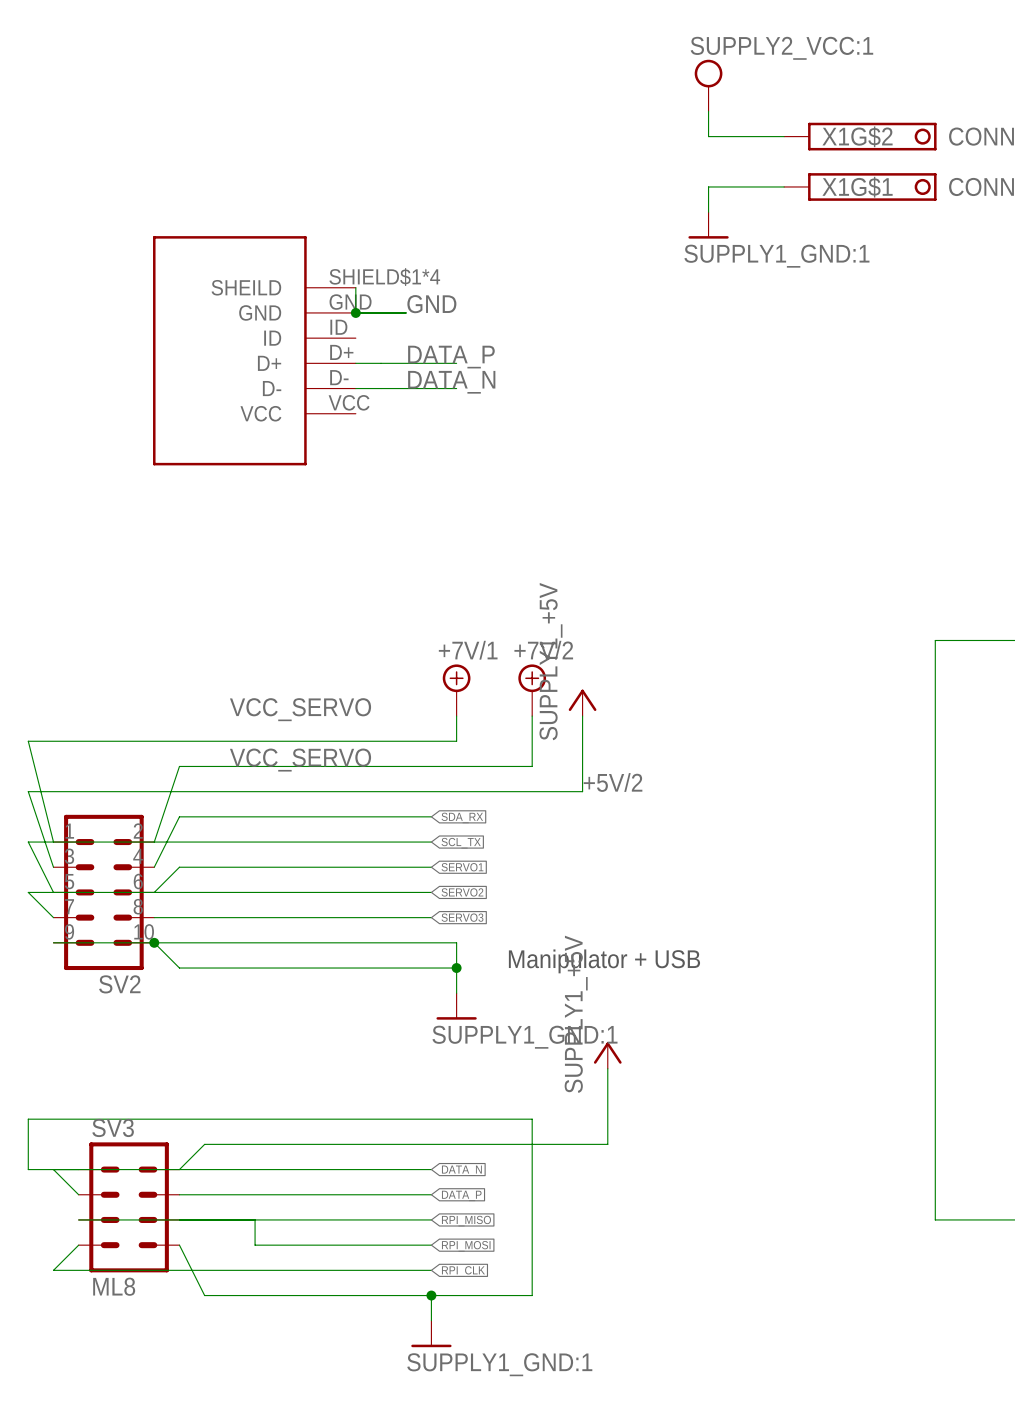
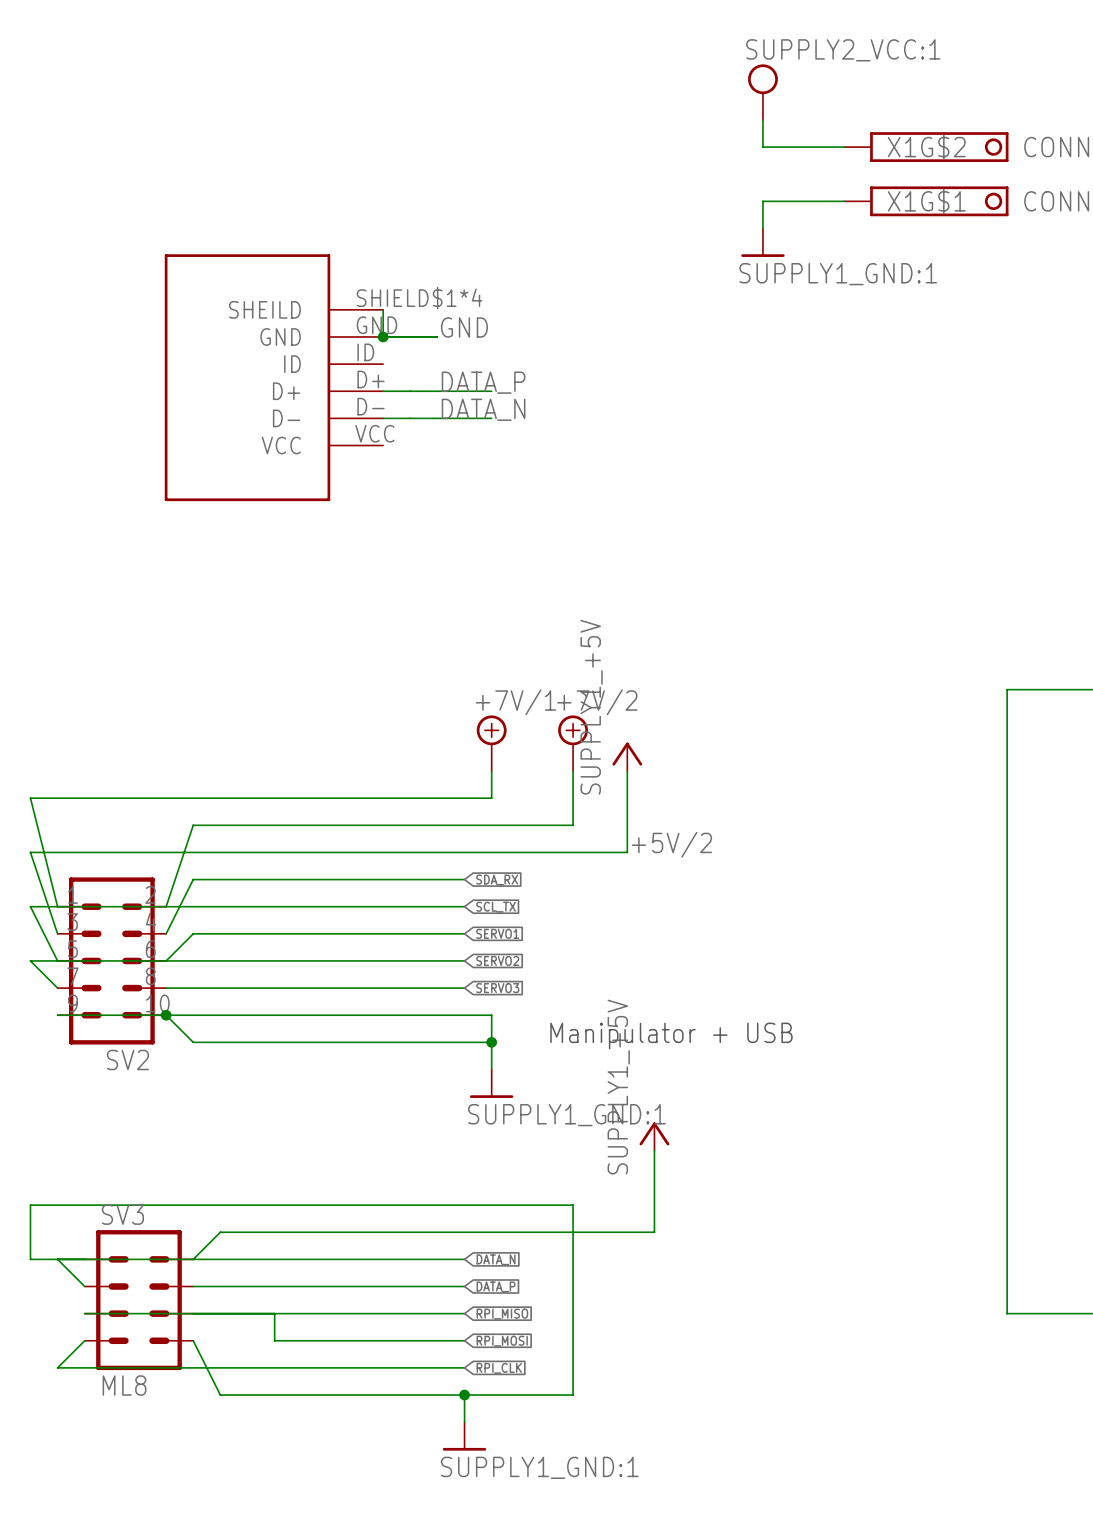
label: VCC_SERVO (300, 709) -> none
label: VCC_SERVO (300, 760) -> none

